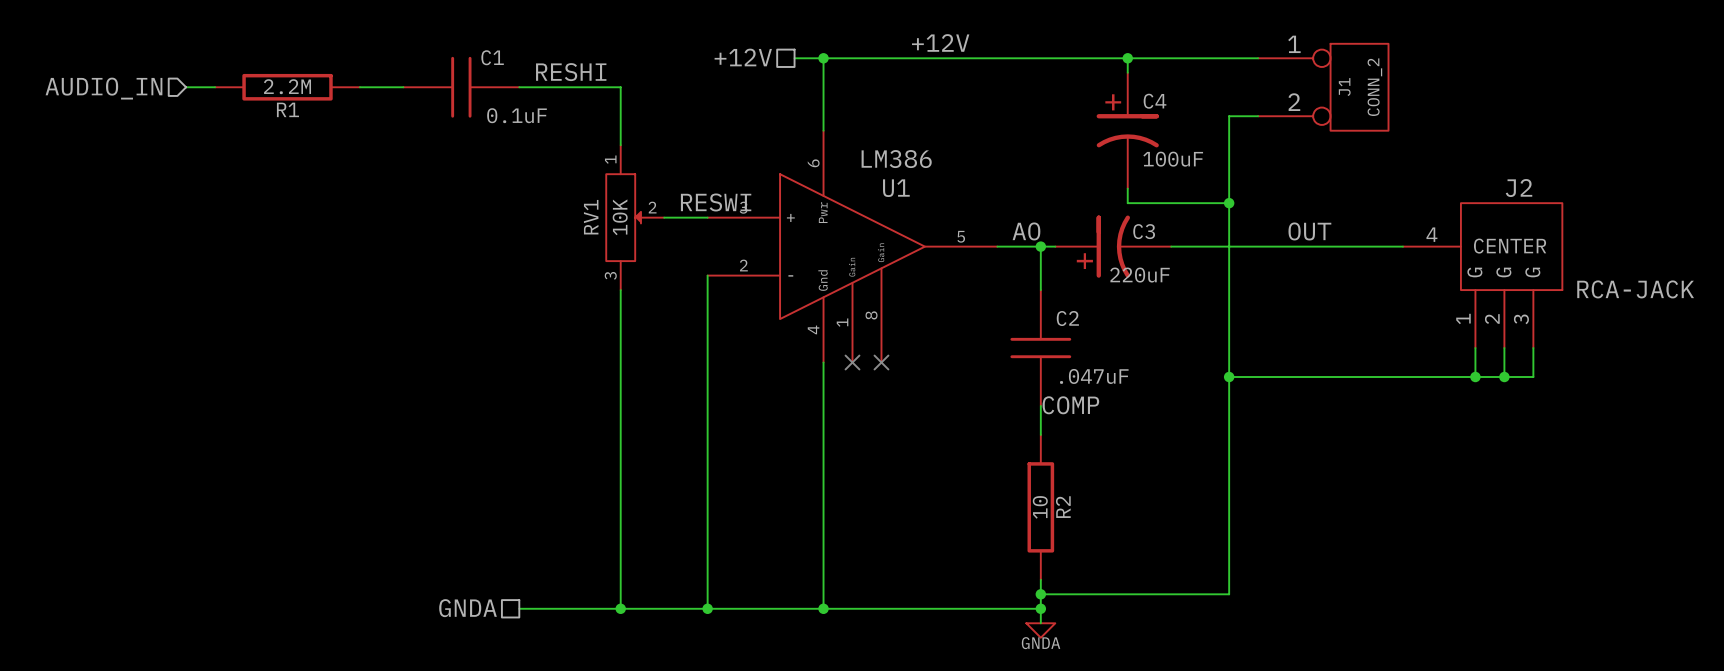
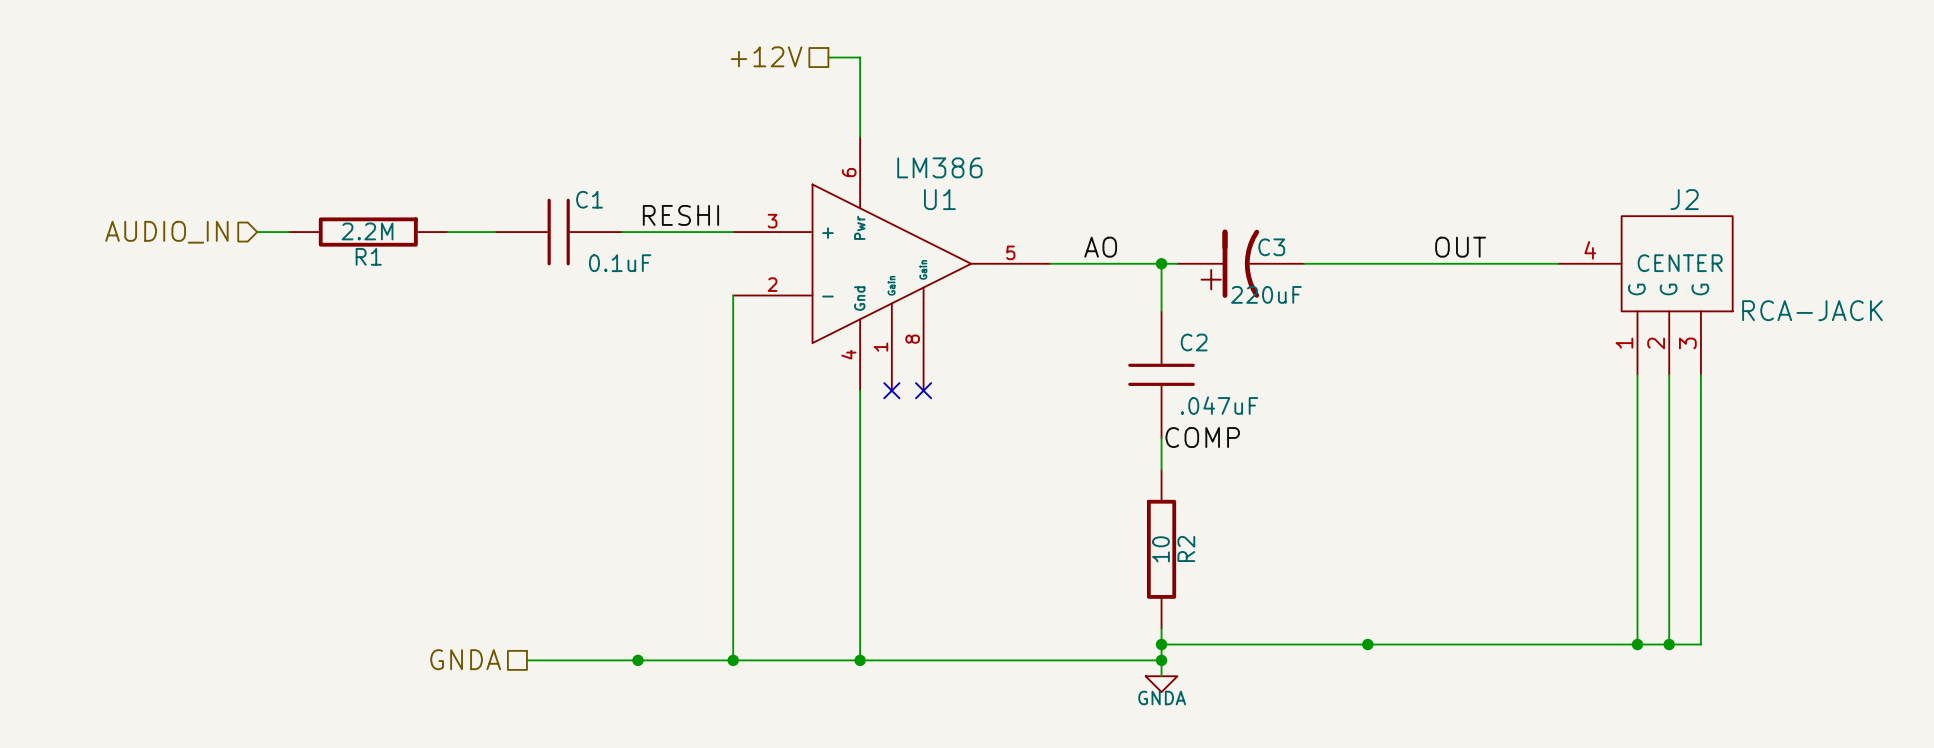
label: +12V (940, 42) -> none
hierarchical label position: +12V (743, 57) -> +12V (766, 56)
wire: none -> (828, 57) (860, 57) (860, 136)
wire: (794, 58) (1258, 58) -> none
wire: (823, 58) (823, 130) -> none
junction: (823, 58) -> none
wire: (1127, 58) (1127, 72) -> none
junction: (1127, 58) -> none
label position: RESHI (571, 72) -> RESHI (680, 215)
wire: (186, 87) (215, 87) -> (257, 232) (288, 232)
R1 position: (287, 87) -> (368, 232)
wire: (359, 87) (403, 87) -> (447, 232) (495, 232)
C1 position: (461, 87) -> (558, 232)
wire: (519, 87) (620, 87) (620, 145) -> none
J1: CONN_2 (1323, 87) -> none
hierarchical label position: AUDIO_IN (103, 88) -> AUDIO_IN (166, 232)
wire: (1258, 116) (1229, 116) (1229, 594) -> none
C4: 100uF (1127, 130) -> none
wire: (1127, 188) (1127, 203) (1229, 203) -> none
label: RESWI (716, 202) -> none
junction: (1229, 203) -> none
wire: none -> (622, 232) (733, 232)
RV1: 10K (635, 217) -> none
label position: AO (1026, 231) -> AO (1100, 247)
U1 position: (852, 246) -> (891, 263)
wire: (707, 275) (707, 608) -> (733, 295) (733, 660)
wire: (620, 290) (620, 608) -> none
no-connect mark: none -> (891, 390)
wire: (823, 362) (823, 608) -> (860, 390) (860, 660)
no-connect mark: none -> (923, 390)
no-connect mark: (852, 362) -> none
no-connect mark: (881, 362) -> none
wire: (1229, 377) (1533, 377) -> (1367, 644) (1700, 644) (1700, 406)
junction: (1229, 377) -> none
wire: none -> (1637, 406) (1637, 644)
junction: (1475, 377) -> none
wire: none -> (1669, 406) (1669, 644)
junction: (1504, 377) -> none
junction: none -> (1367, 644)
junction: none -> (1637, 644)
junction: none -> (1669, 644)
wire: none -> (526, 660) (590, 660)
hierarchical label position: GNDA (468, 608) -> GNDA (465, 659)
junction: none -> (638, 660)
junction: (620, 608) -> none
junction: none -> (733, 660)
junction: (707, 608) -> none
junction: none -> (860, 660)
junction: (823, 608) -> none

